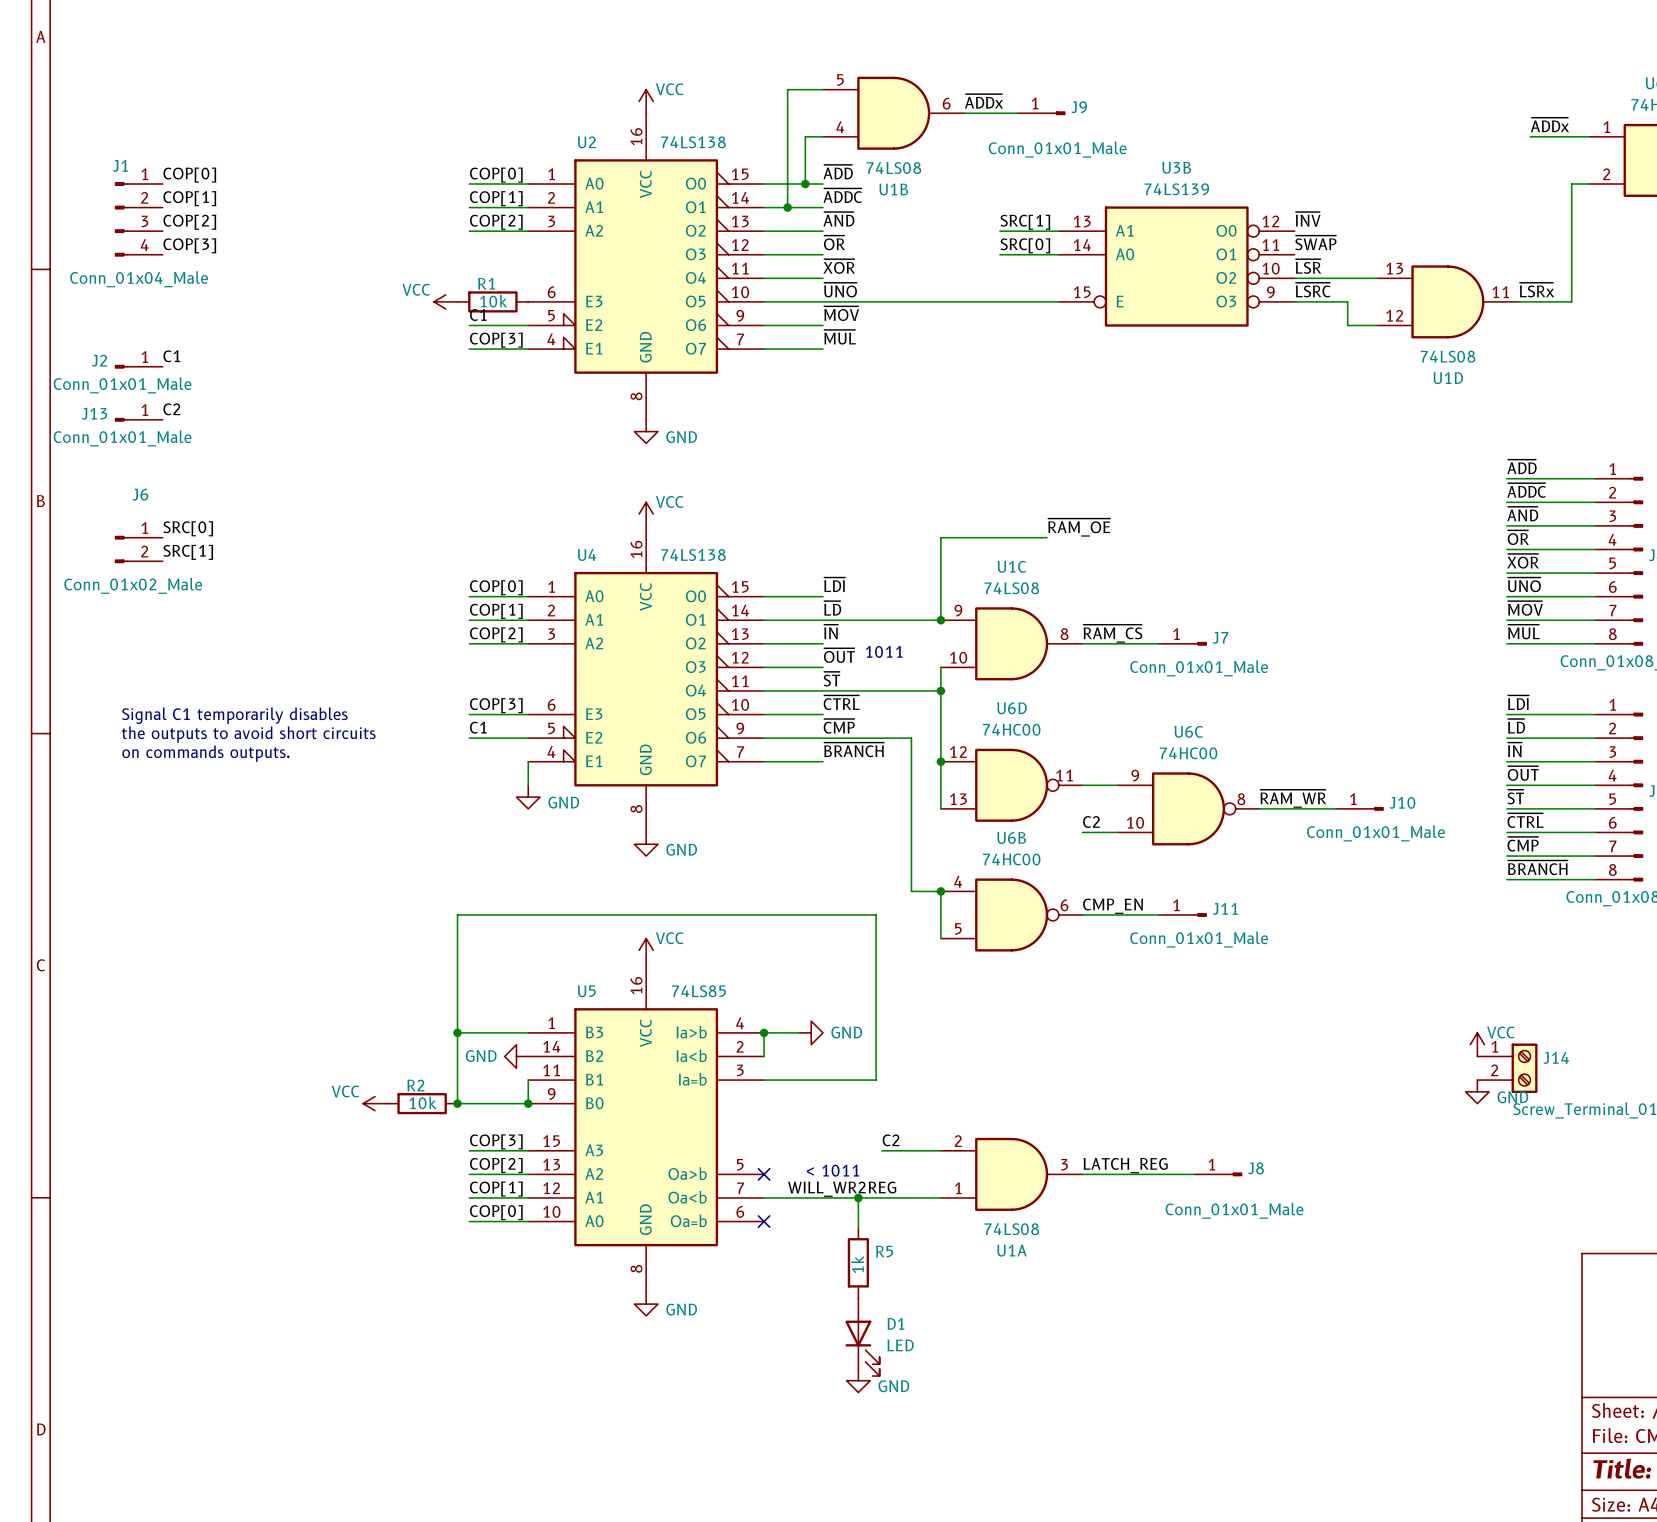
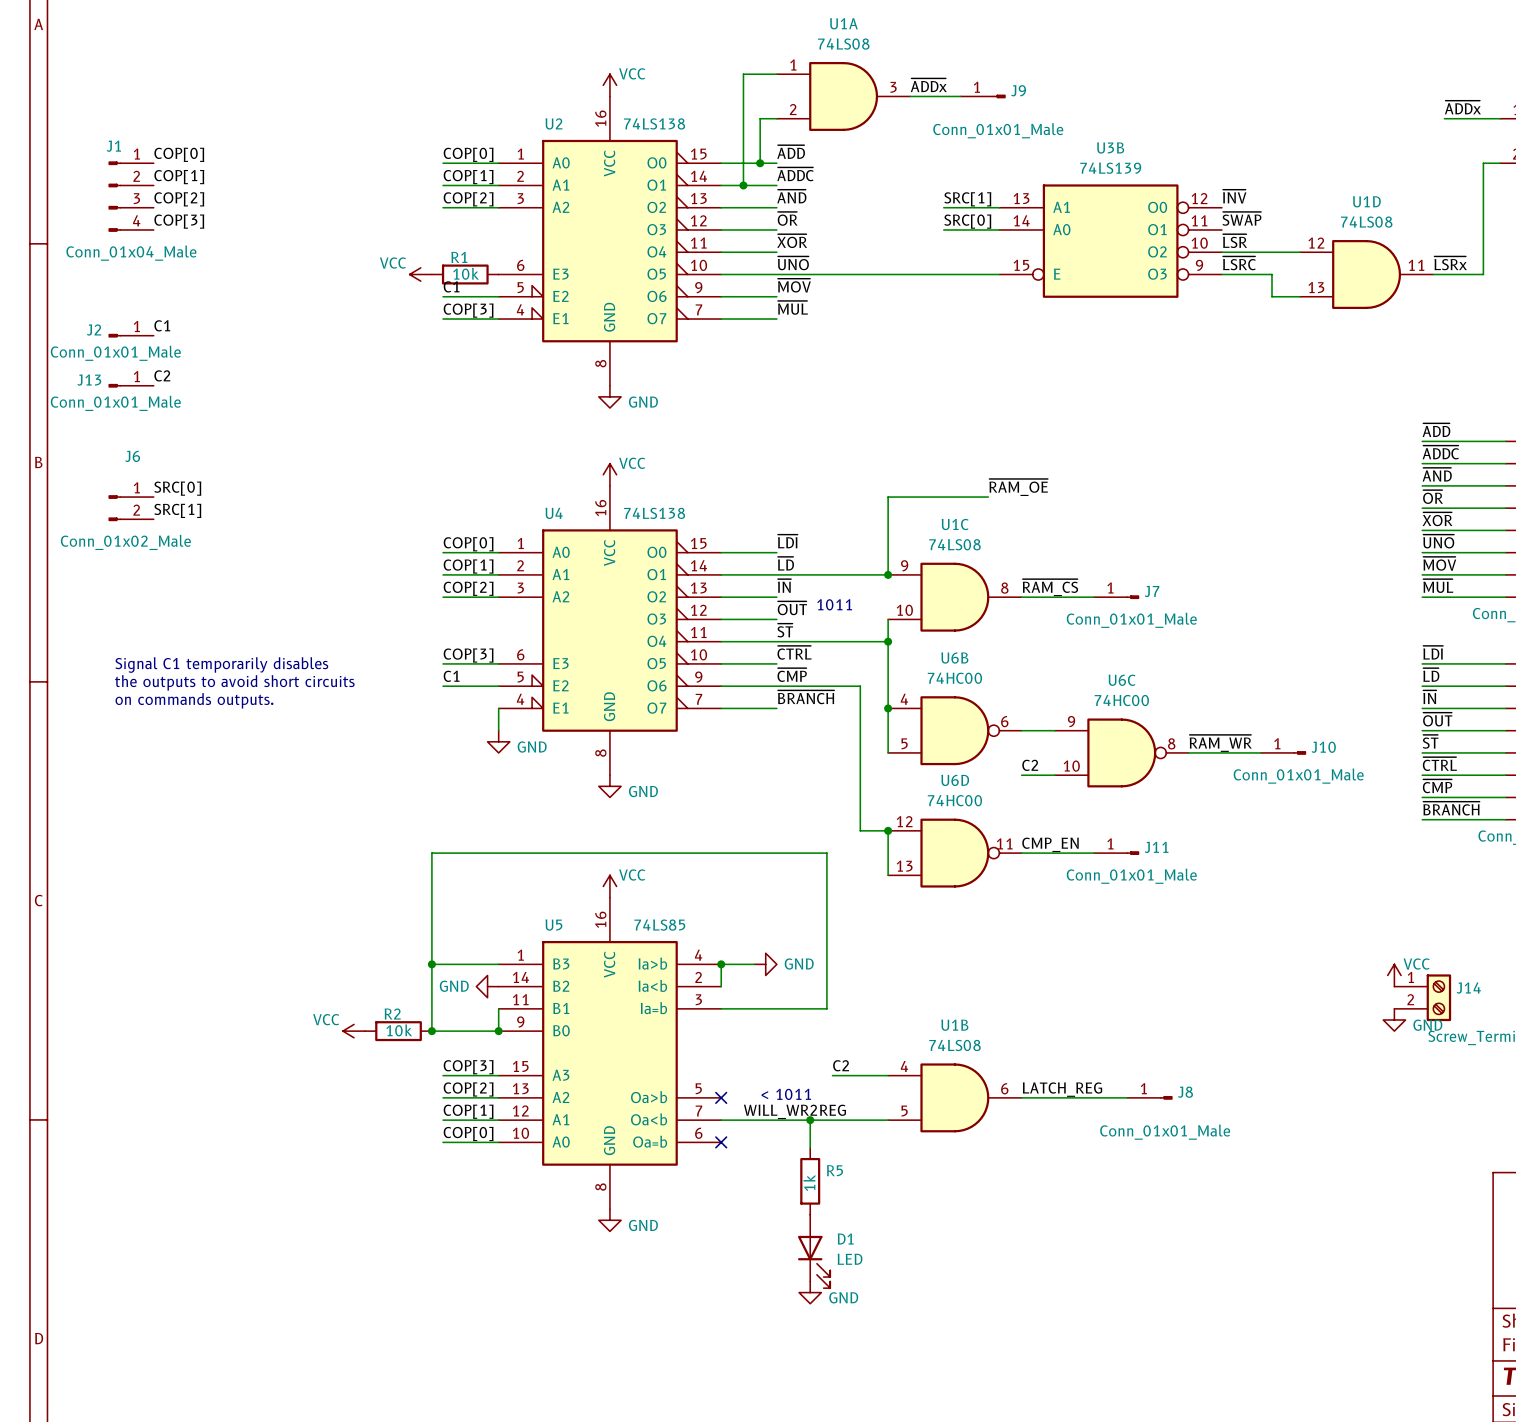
U1B flip: as is (893, 113) -> up-down (954, 1097)
U1B position: (893, 113) -> (954, 1097)
U1D flip: as is (1447, 301) -> up-down (1366, 274)
U6D position: (1011, 785) -> (954, 853)
U6B position: (1011, 915) -> (954, 730)
U1A flip: as is (1011, 1174) -> up-down (843, 96)
U1A position: (1011, 1174) -> (843, 96)

